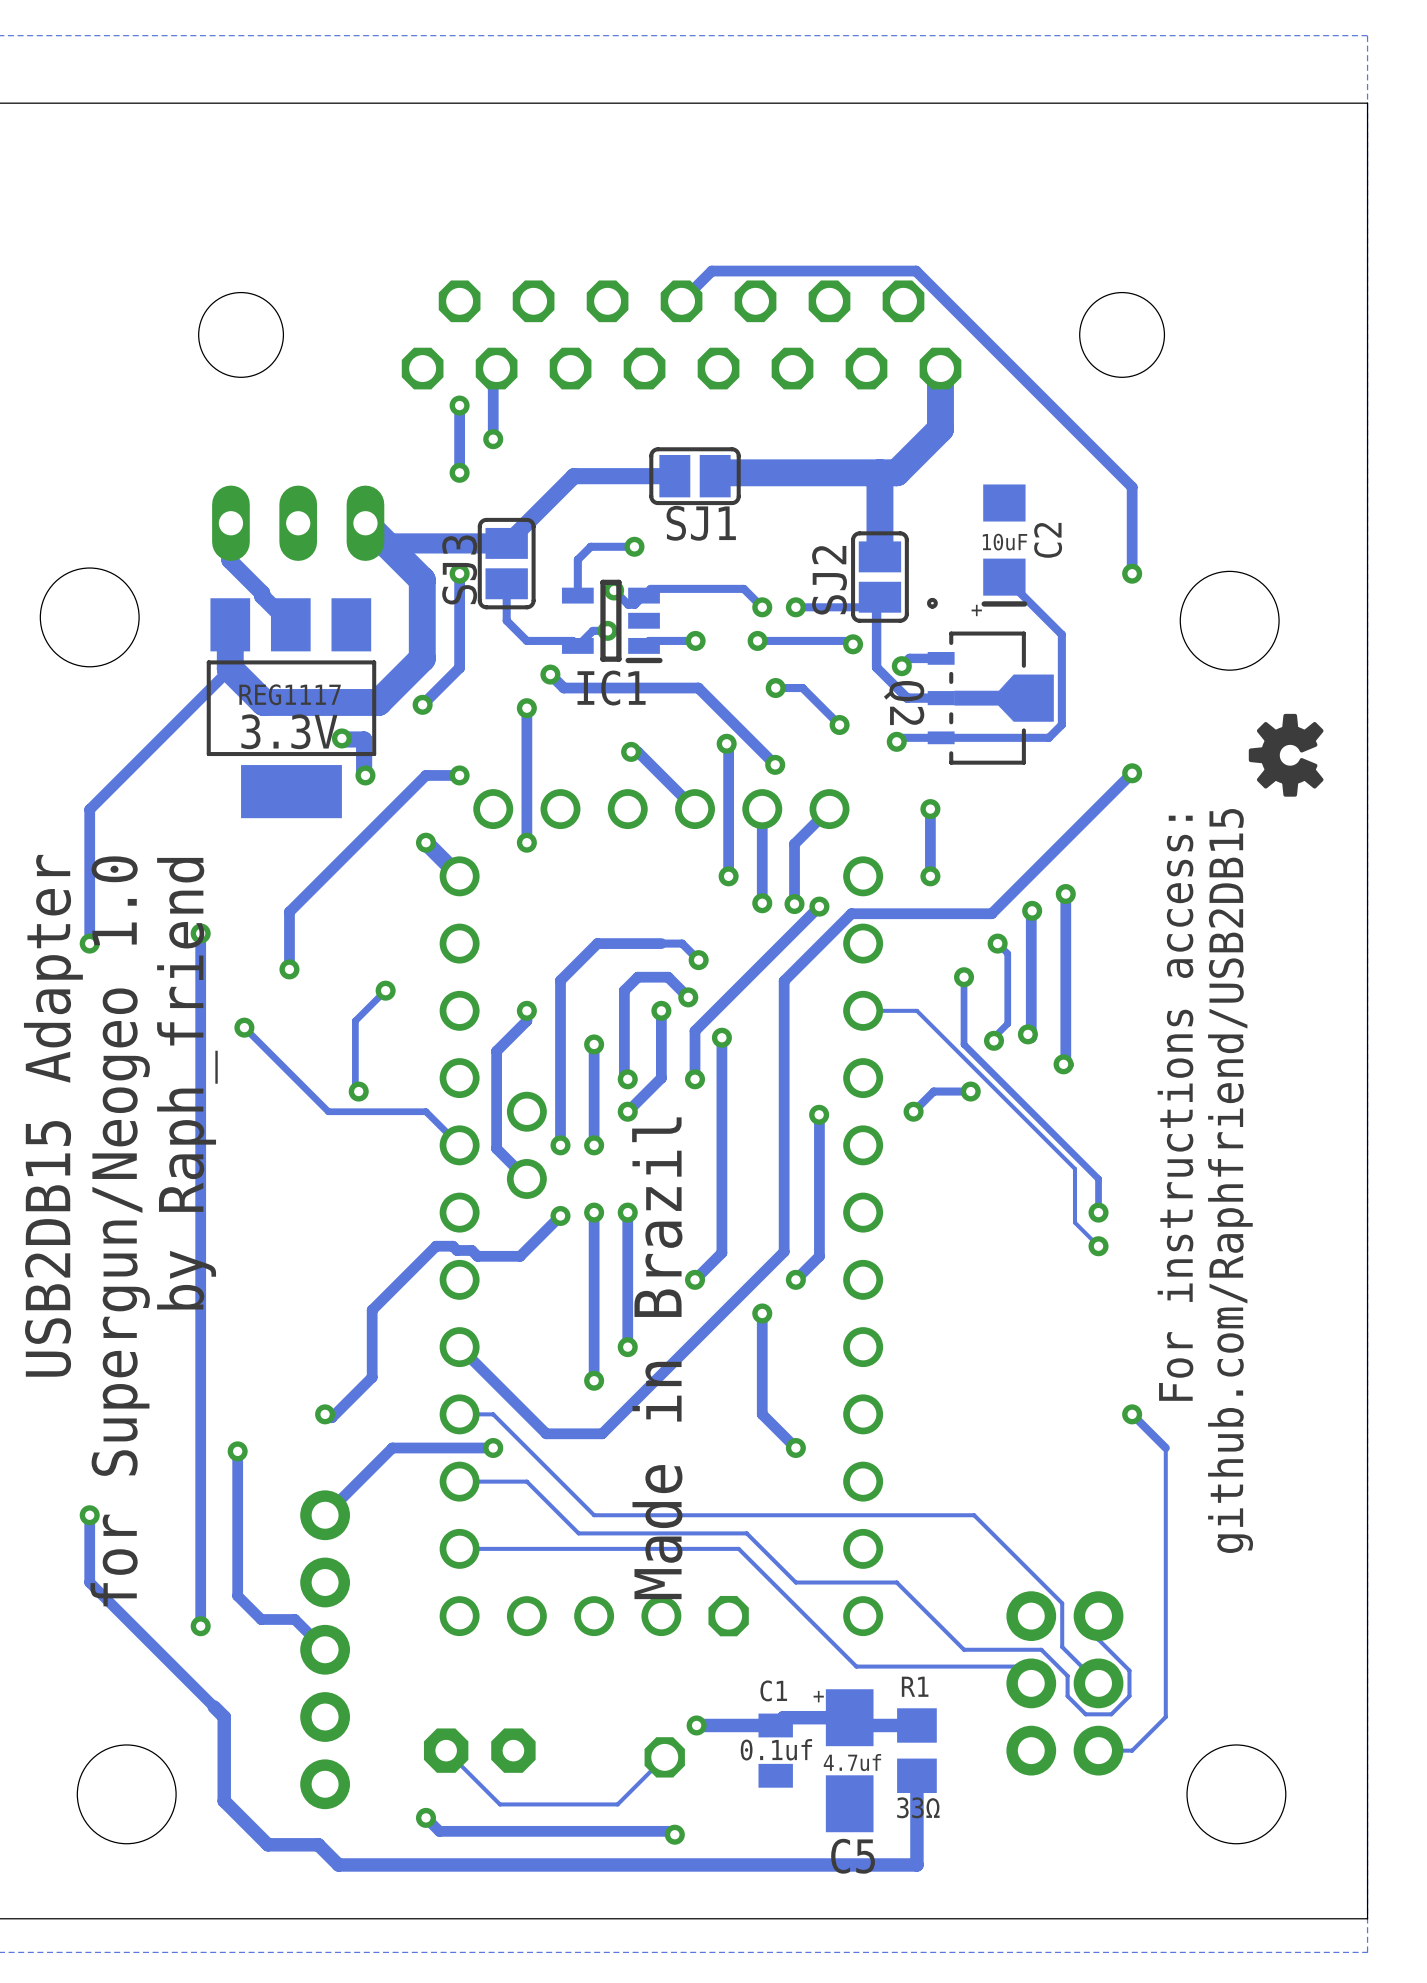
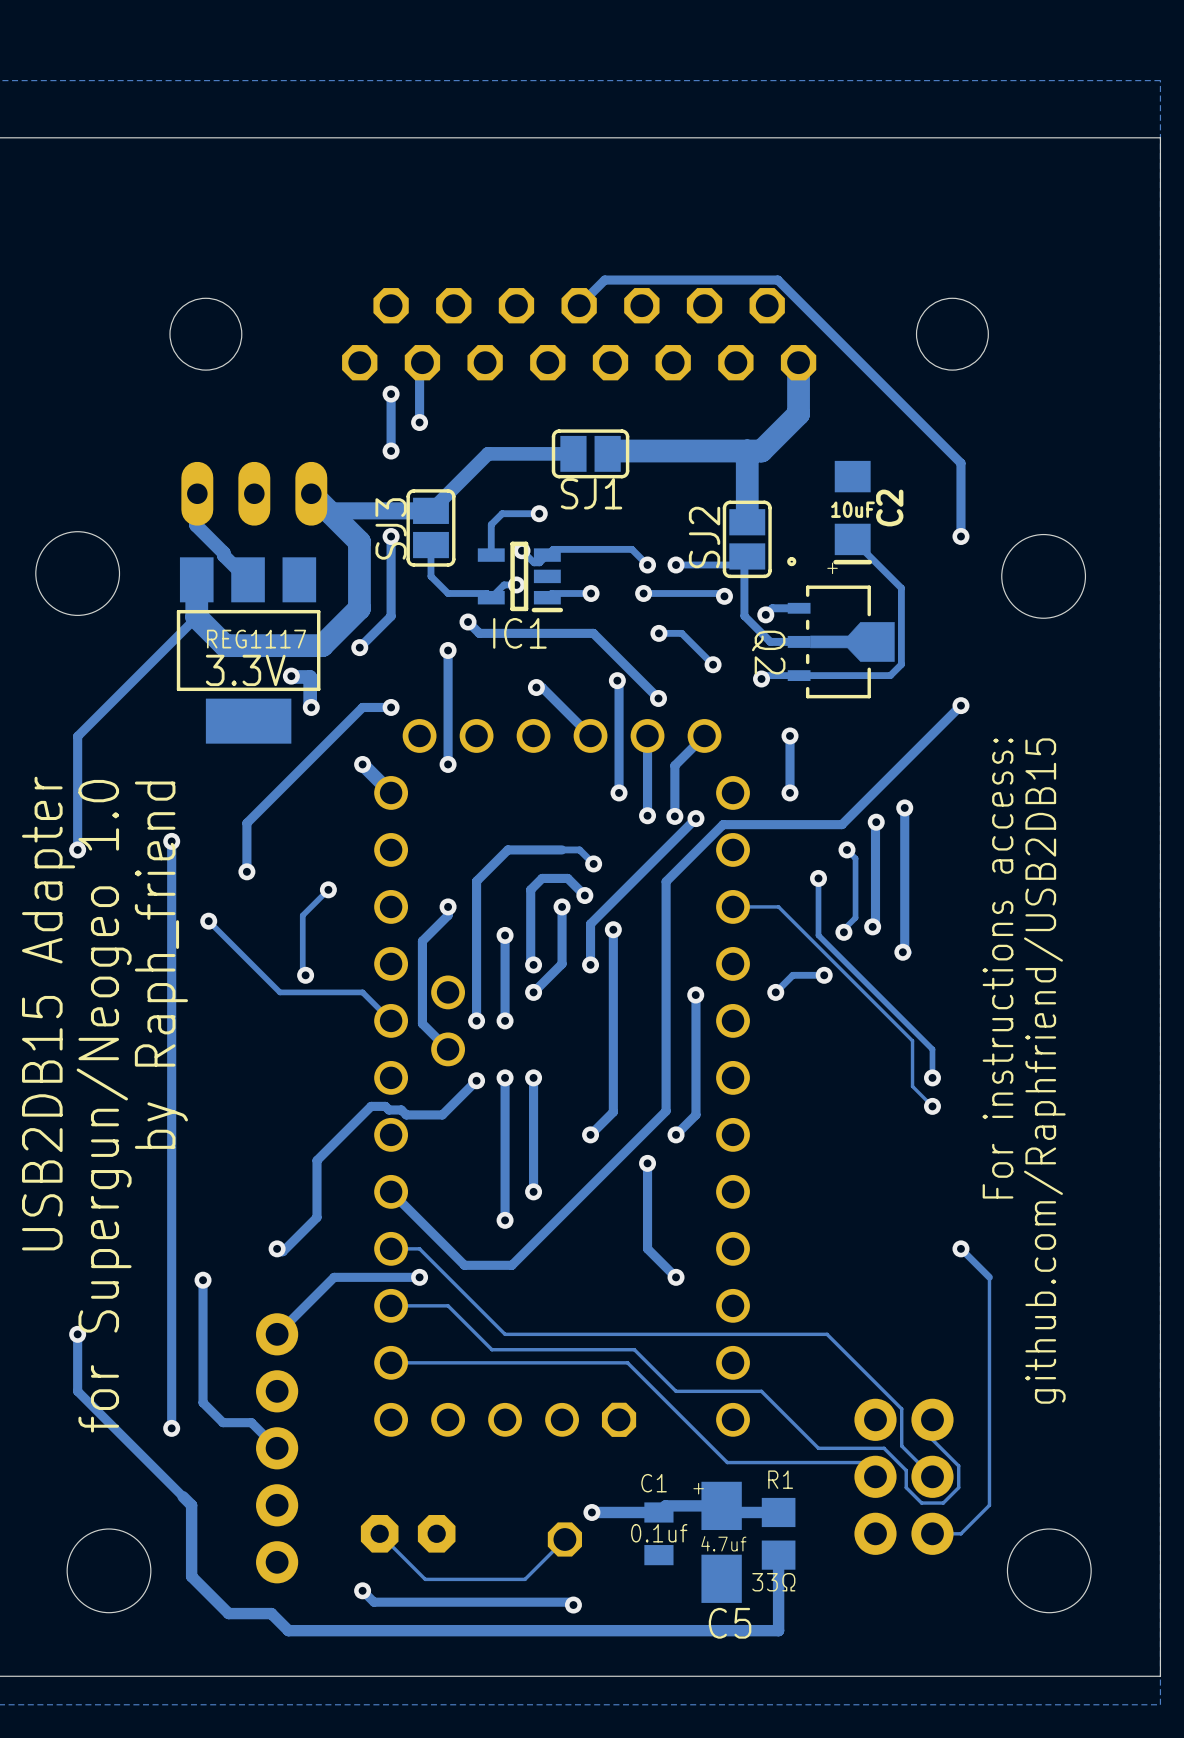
drawing: [1248, 713, 1324, 797] -> none
text: Made in Brazil (657, 1358) -> none

